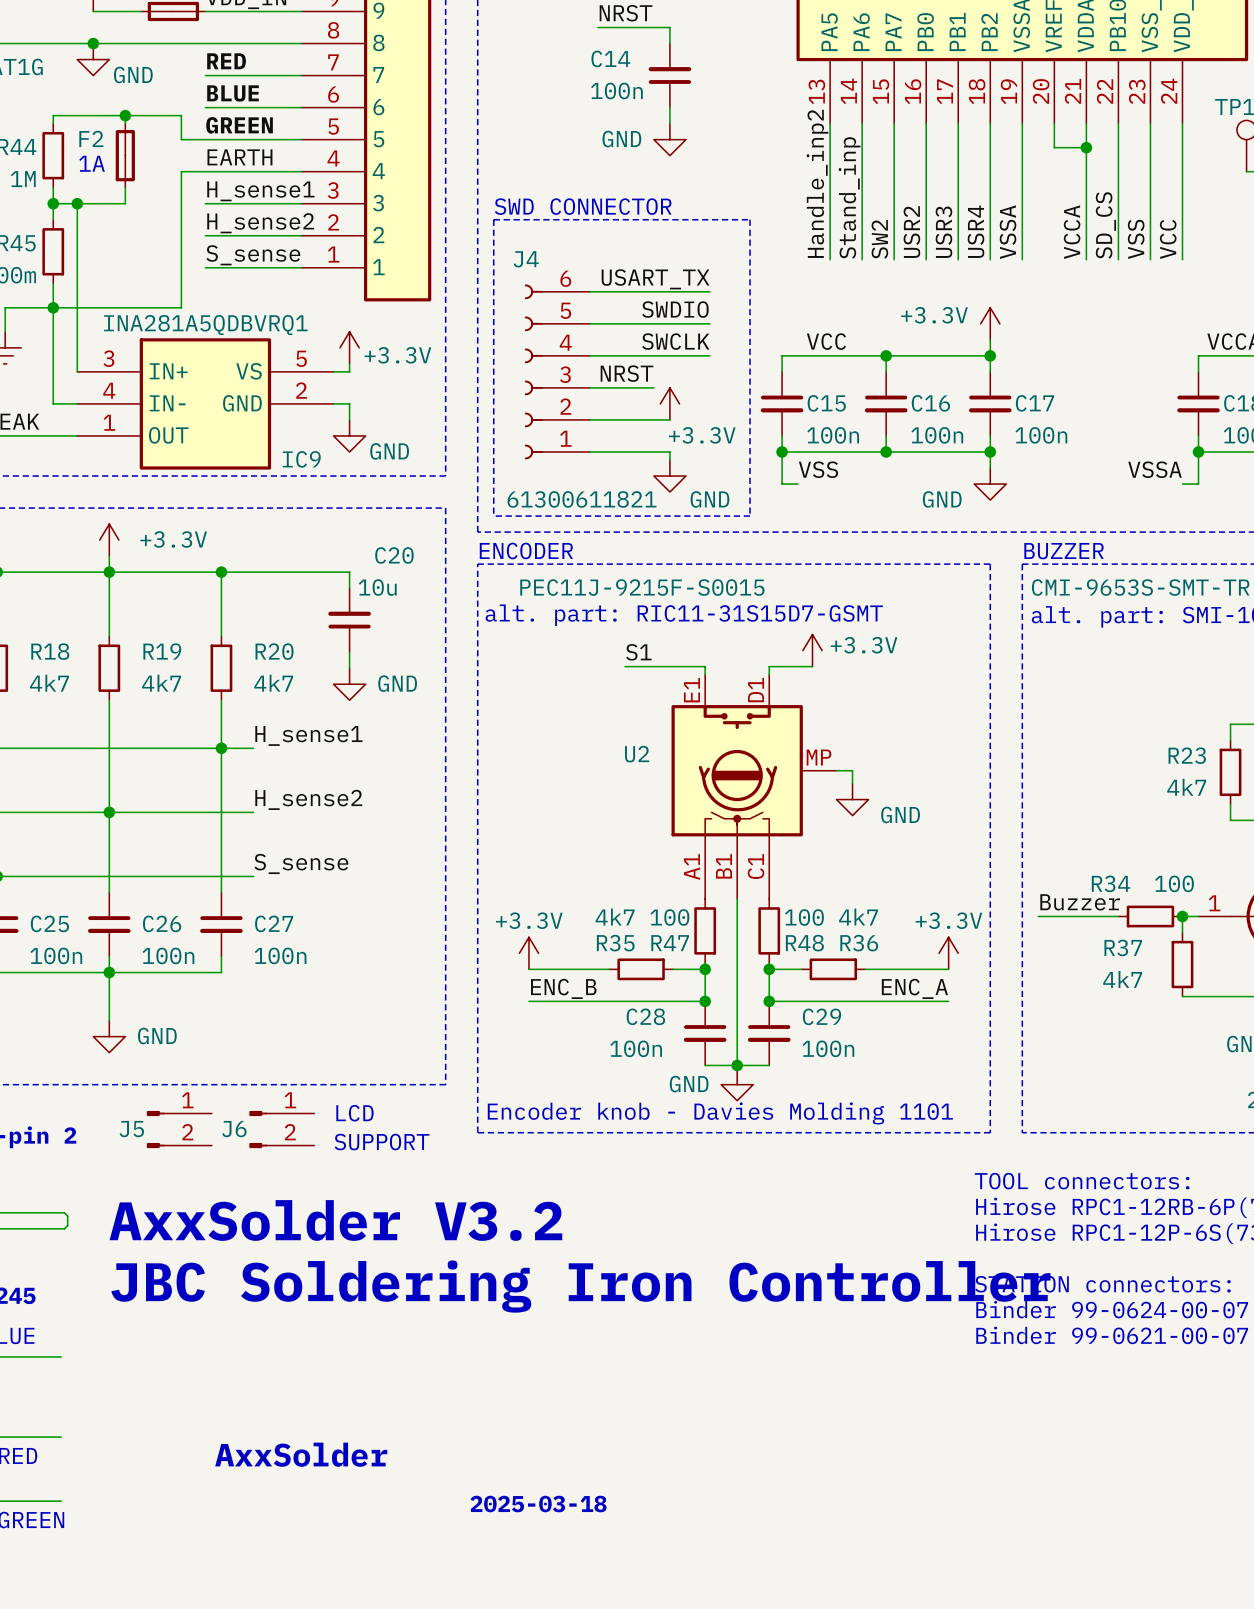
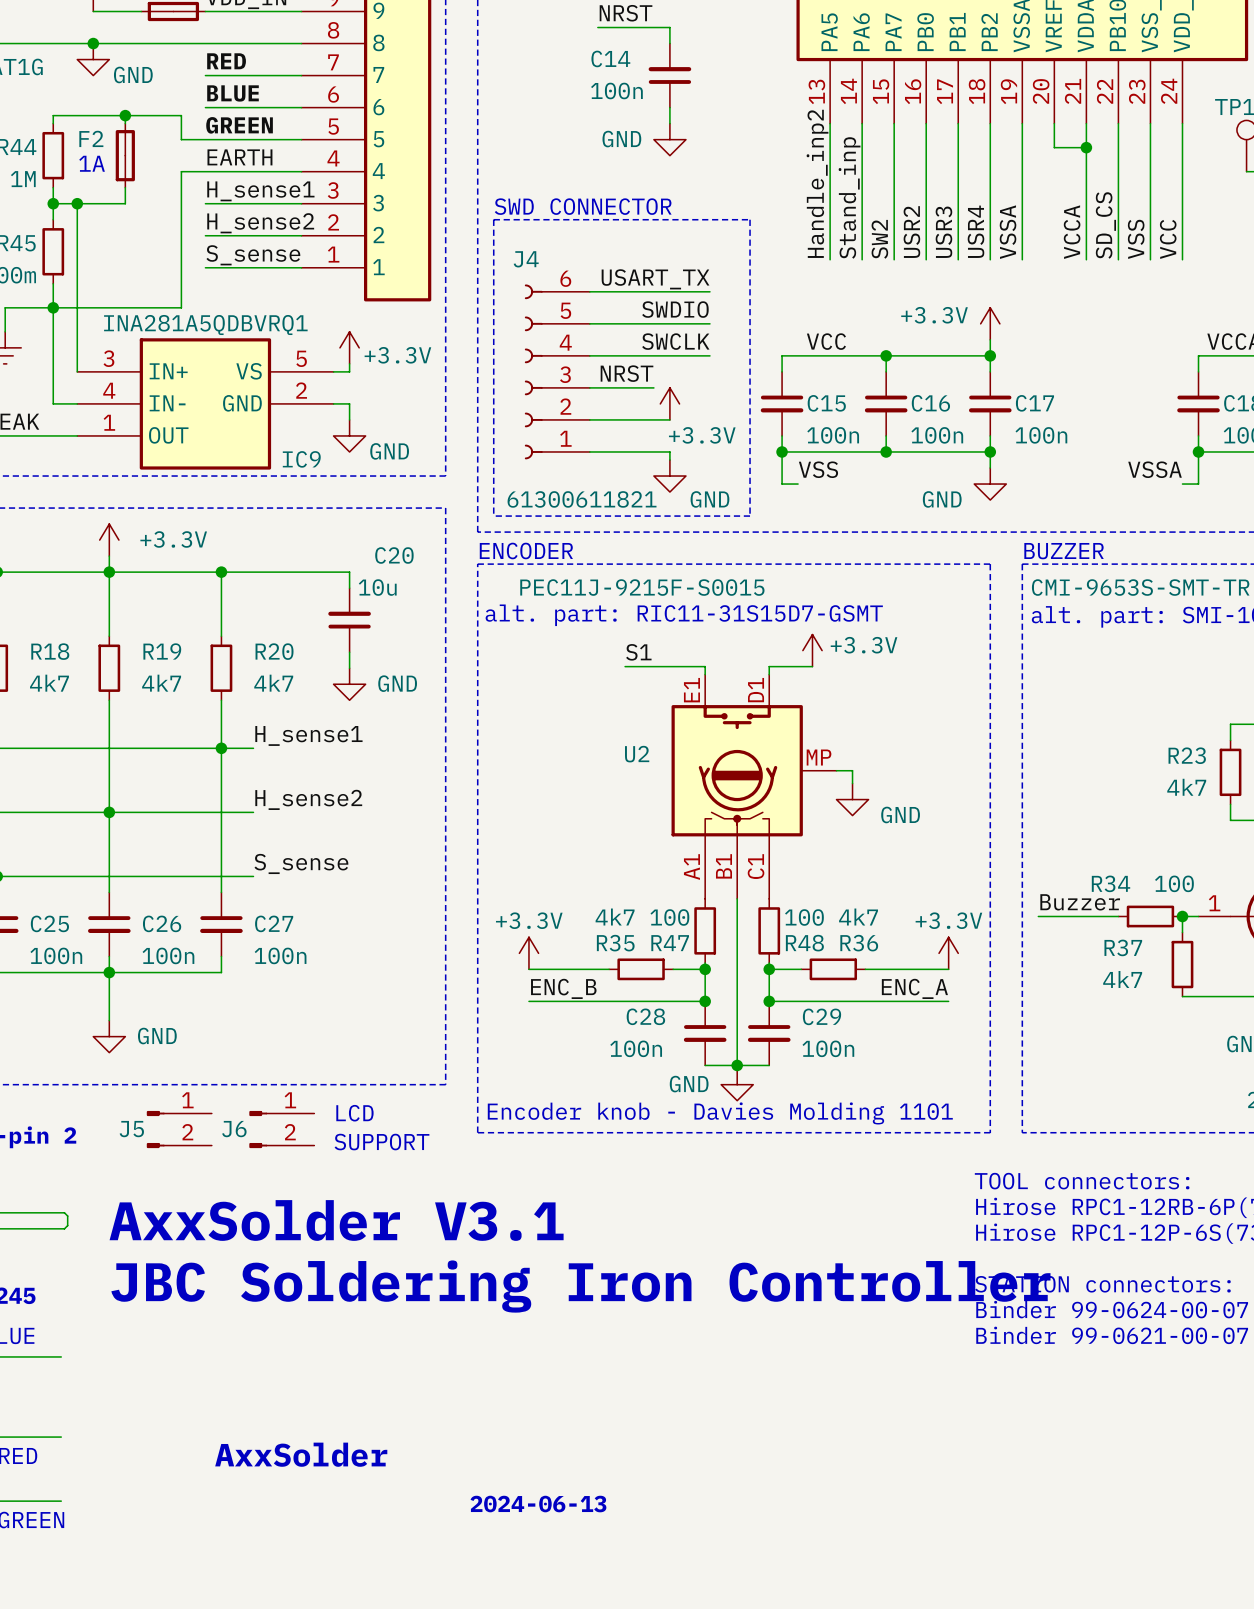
text: AxxSolder V3.2 (335, 1220) -> AxxSolder V3.1 (336, 1220)
text: 2025-03-18 (538, 1504) -> 2024-06-13 (538, 1504)

